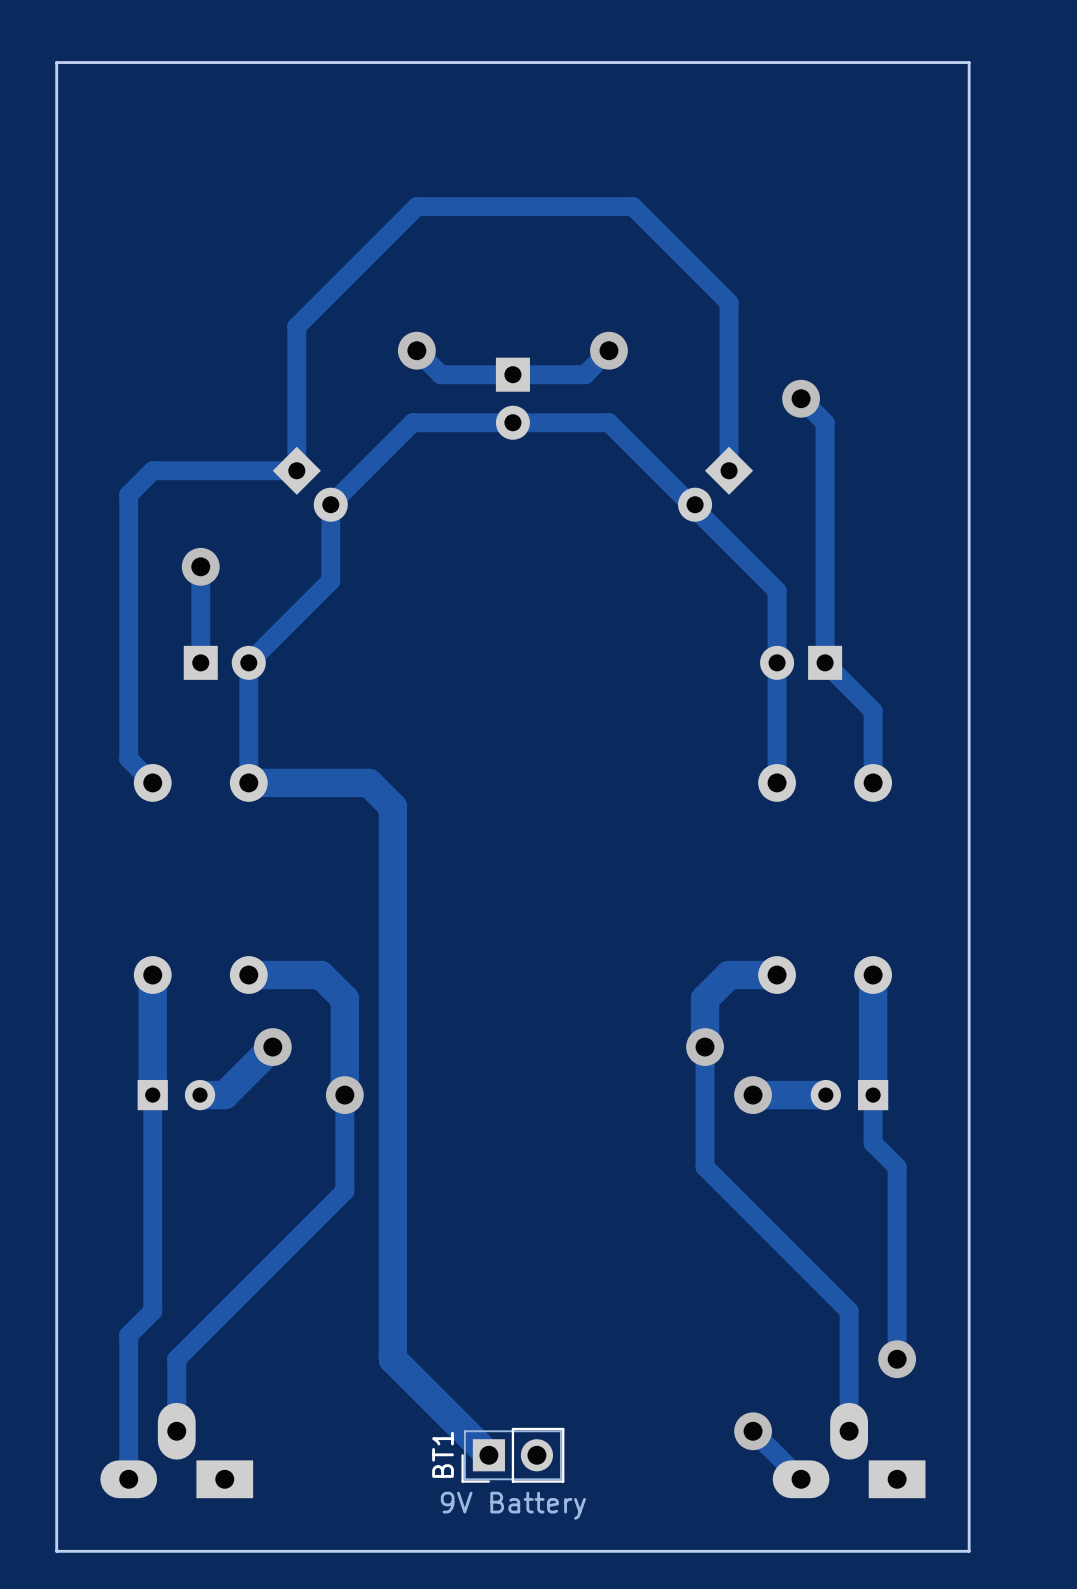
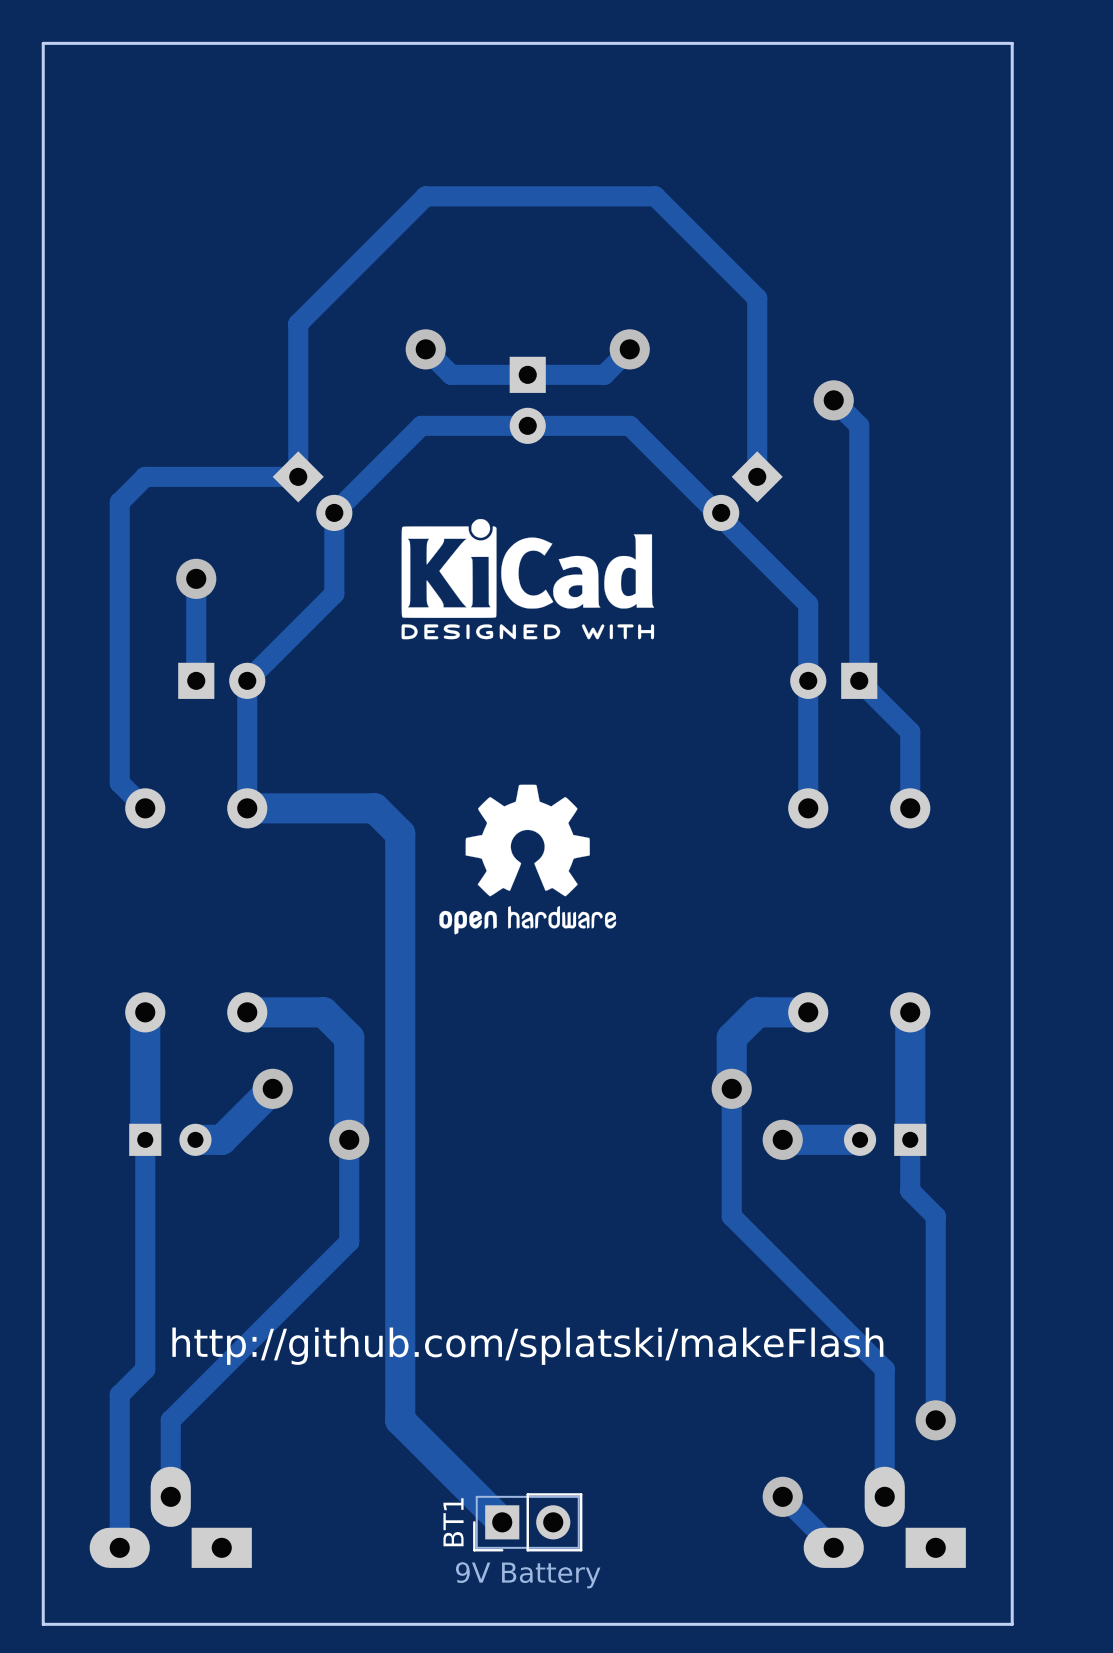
drawing: none -> [401, 518, 655, 640]
drawing: none -> [439, 784, 617, 935]
text: none -> http://github.com/splatski/makeFlash (527, 1346)

